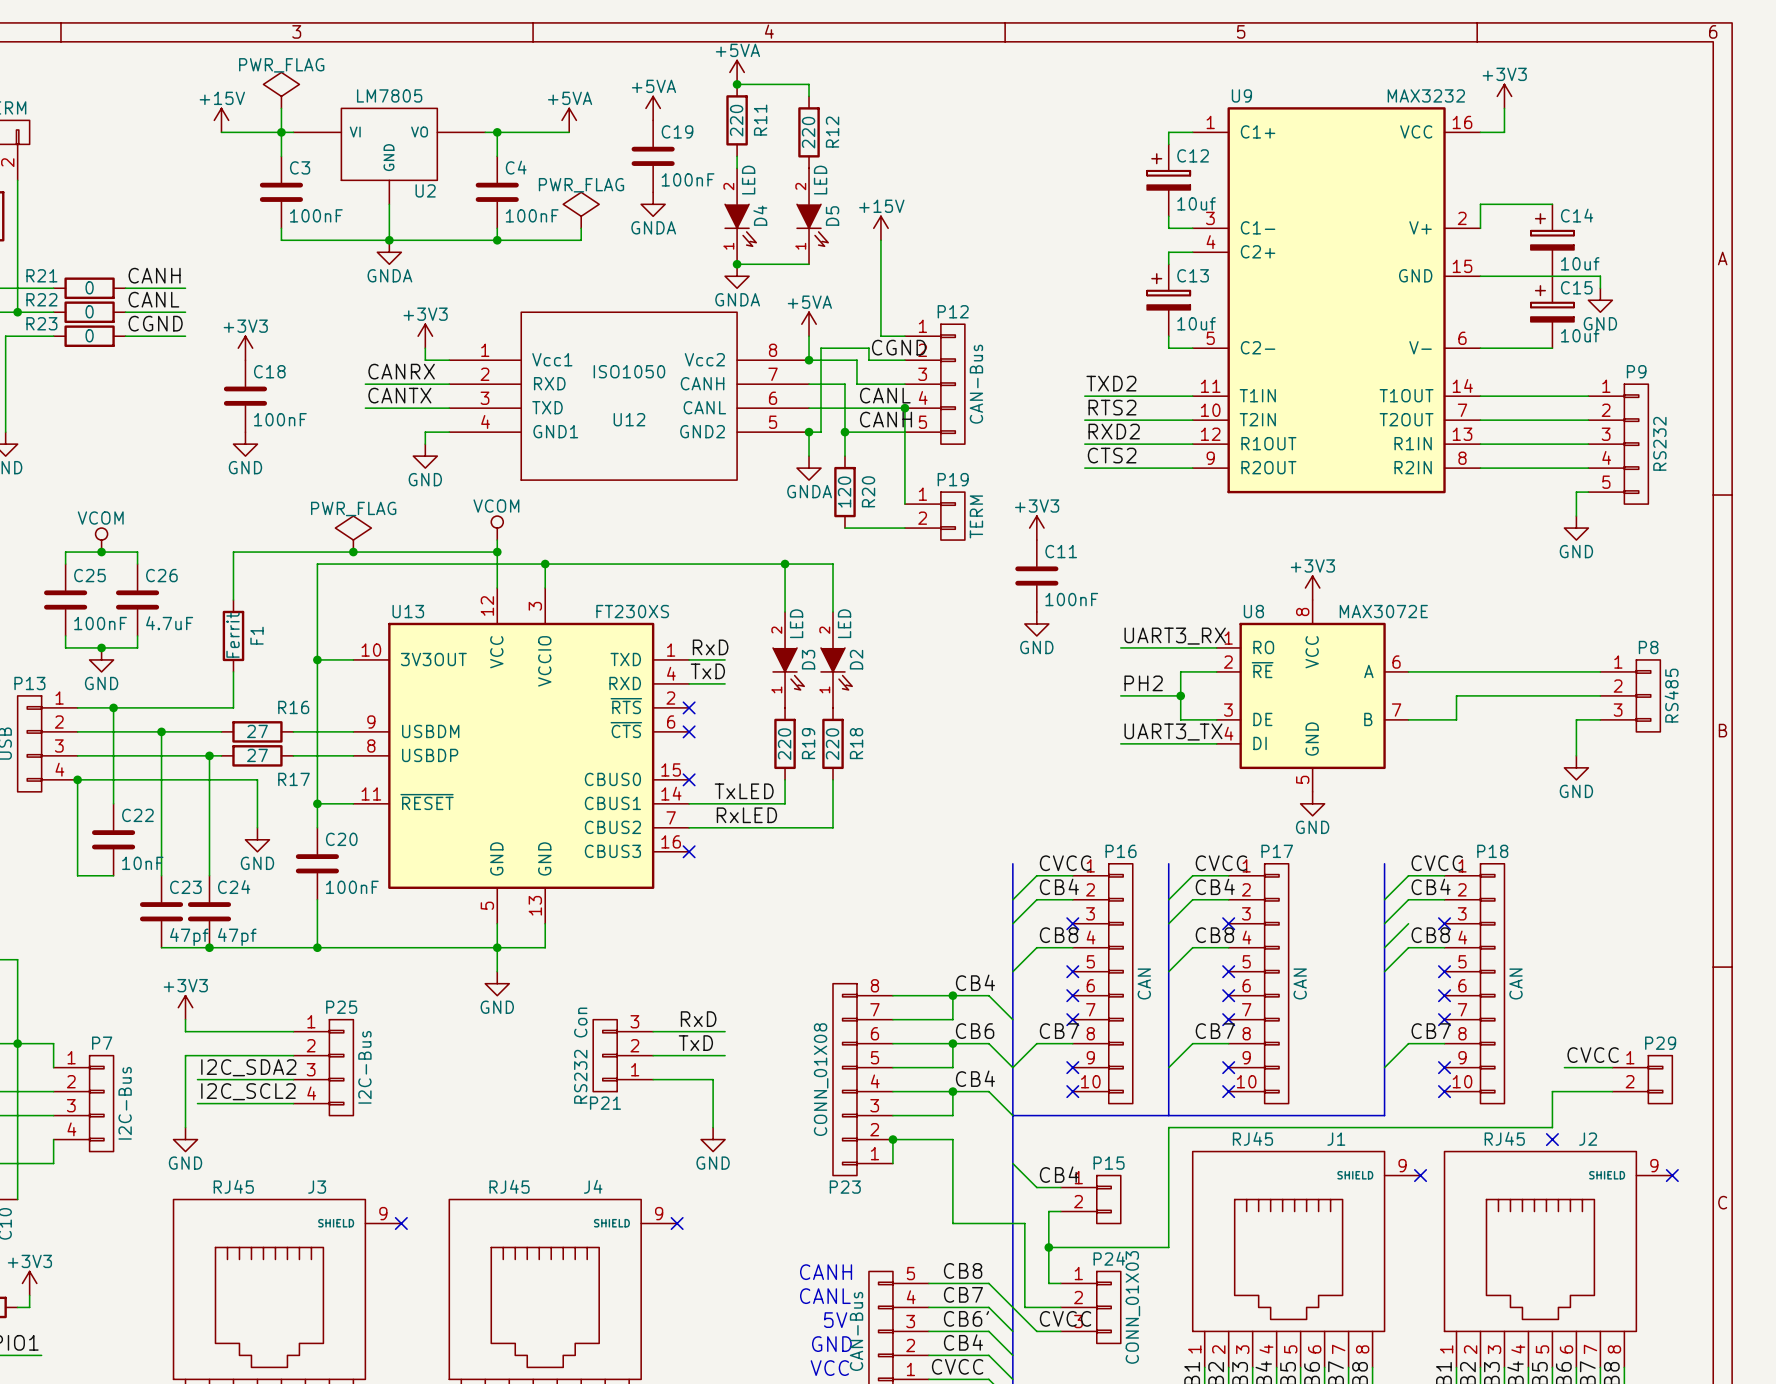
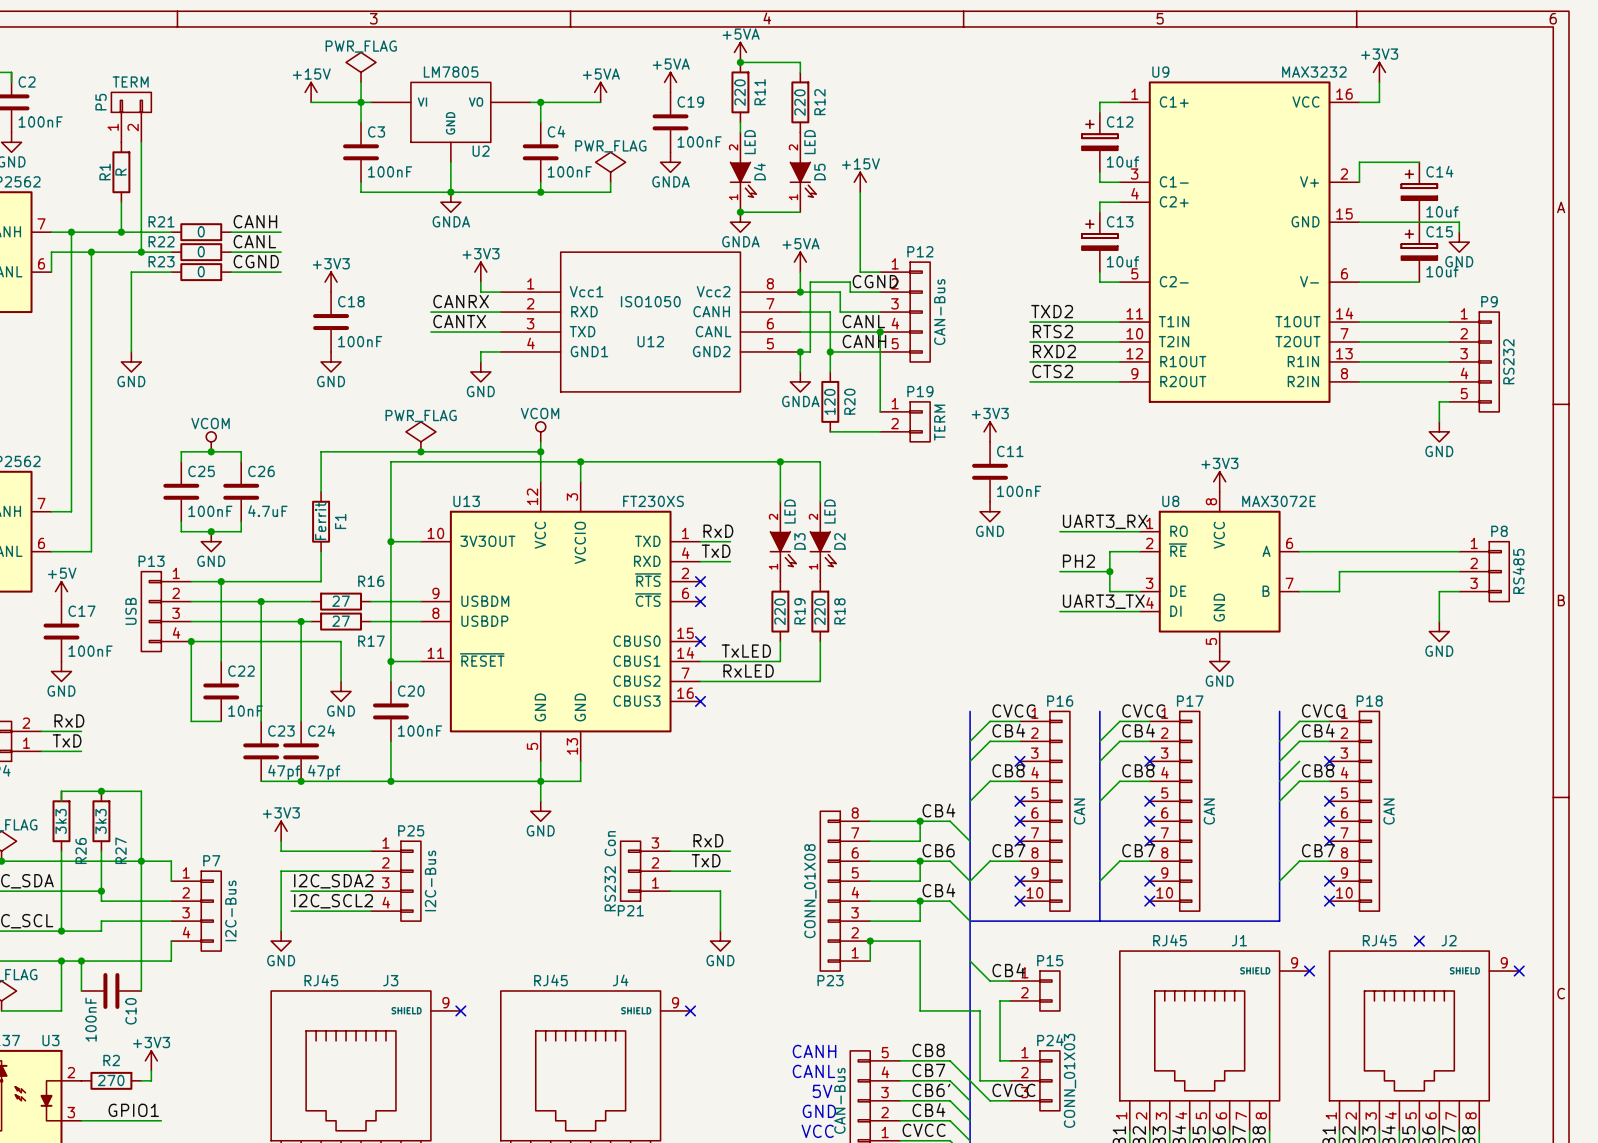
label: CVCC (1593, 1055) -> none
wire: (1564, 1067) (1612, 1067) -> none
P29: (1642, 1079) -> none
wire: (1612, 1091) (1552, 1091) (1552, 1127) (1168, 1127) (1168, 1247) (1048, 1247) -> none
junction: (1048, 1247) -> none

